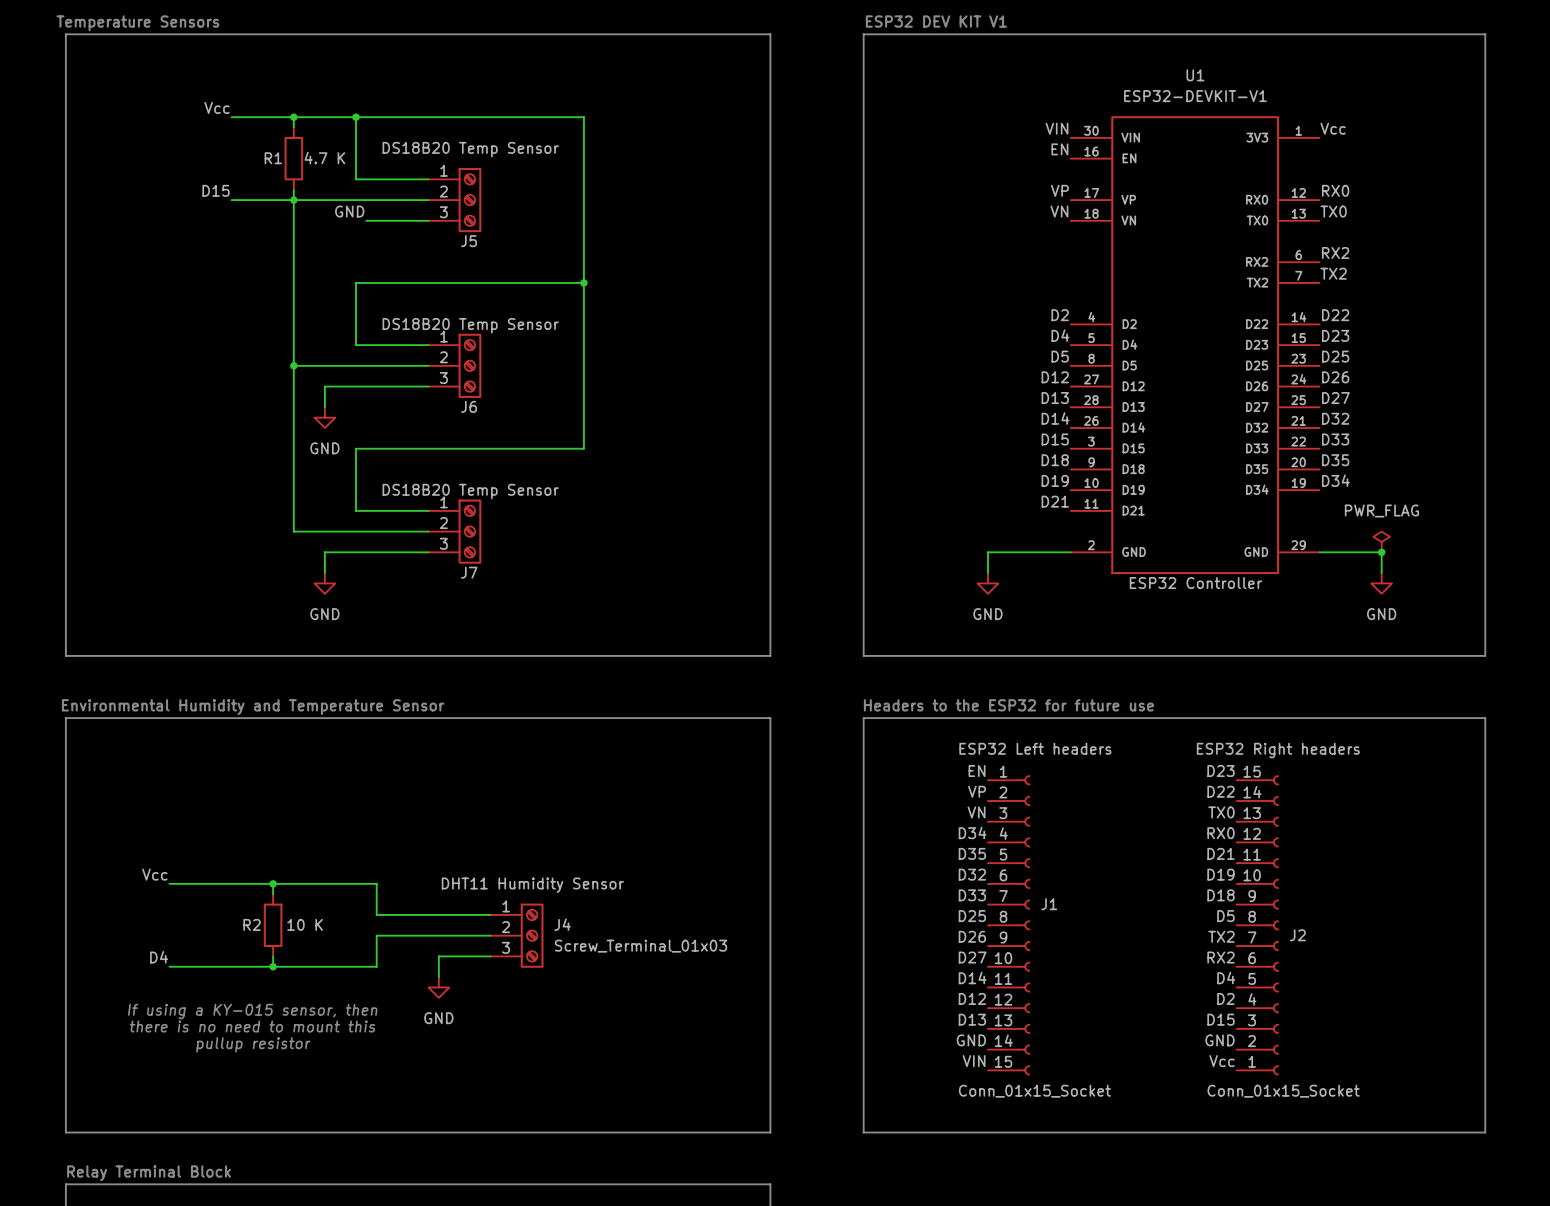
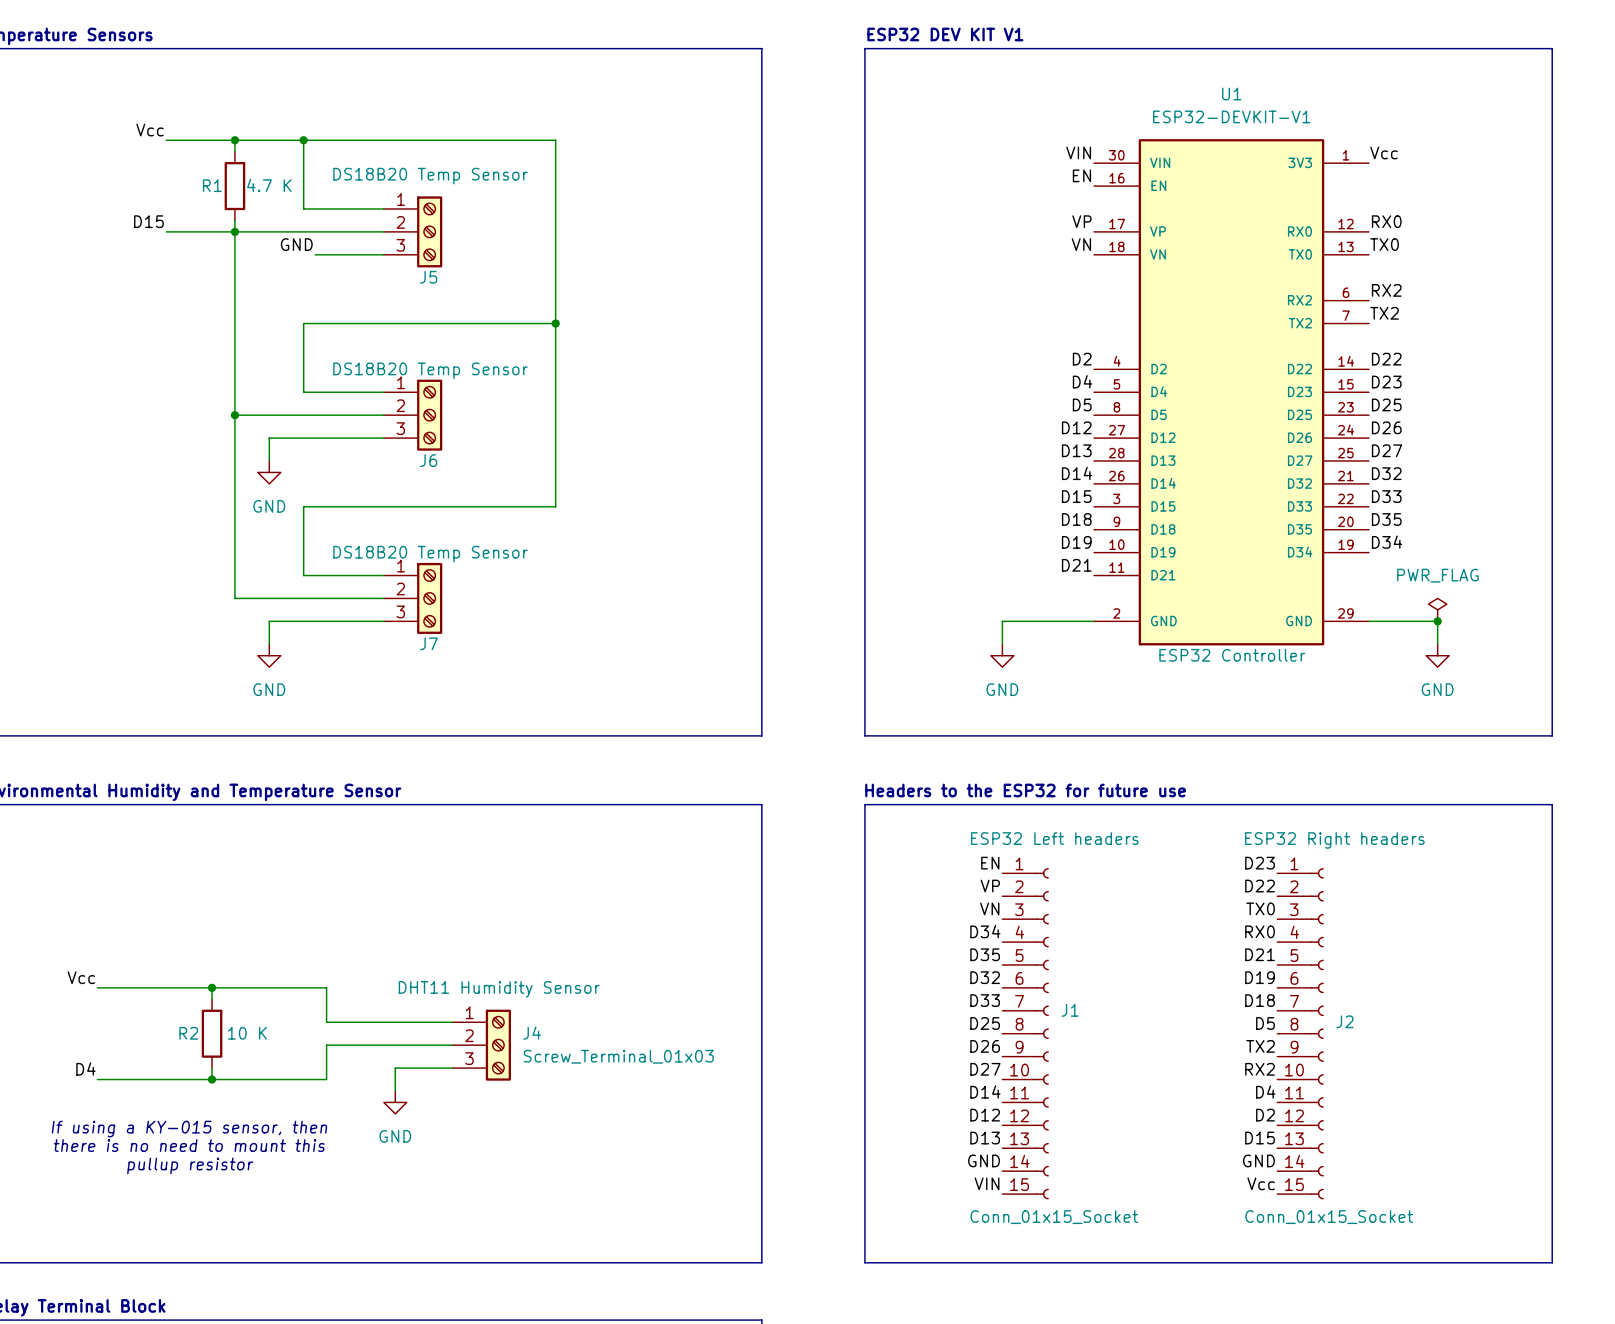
J2 flip: as is (1272, 925) -> up-down (1317, 1033)

